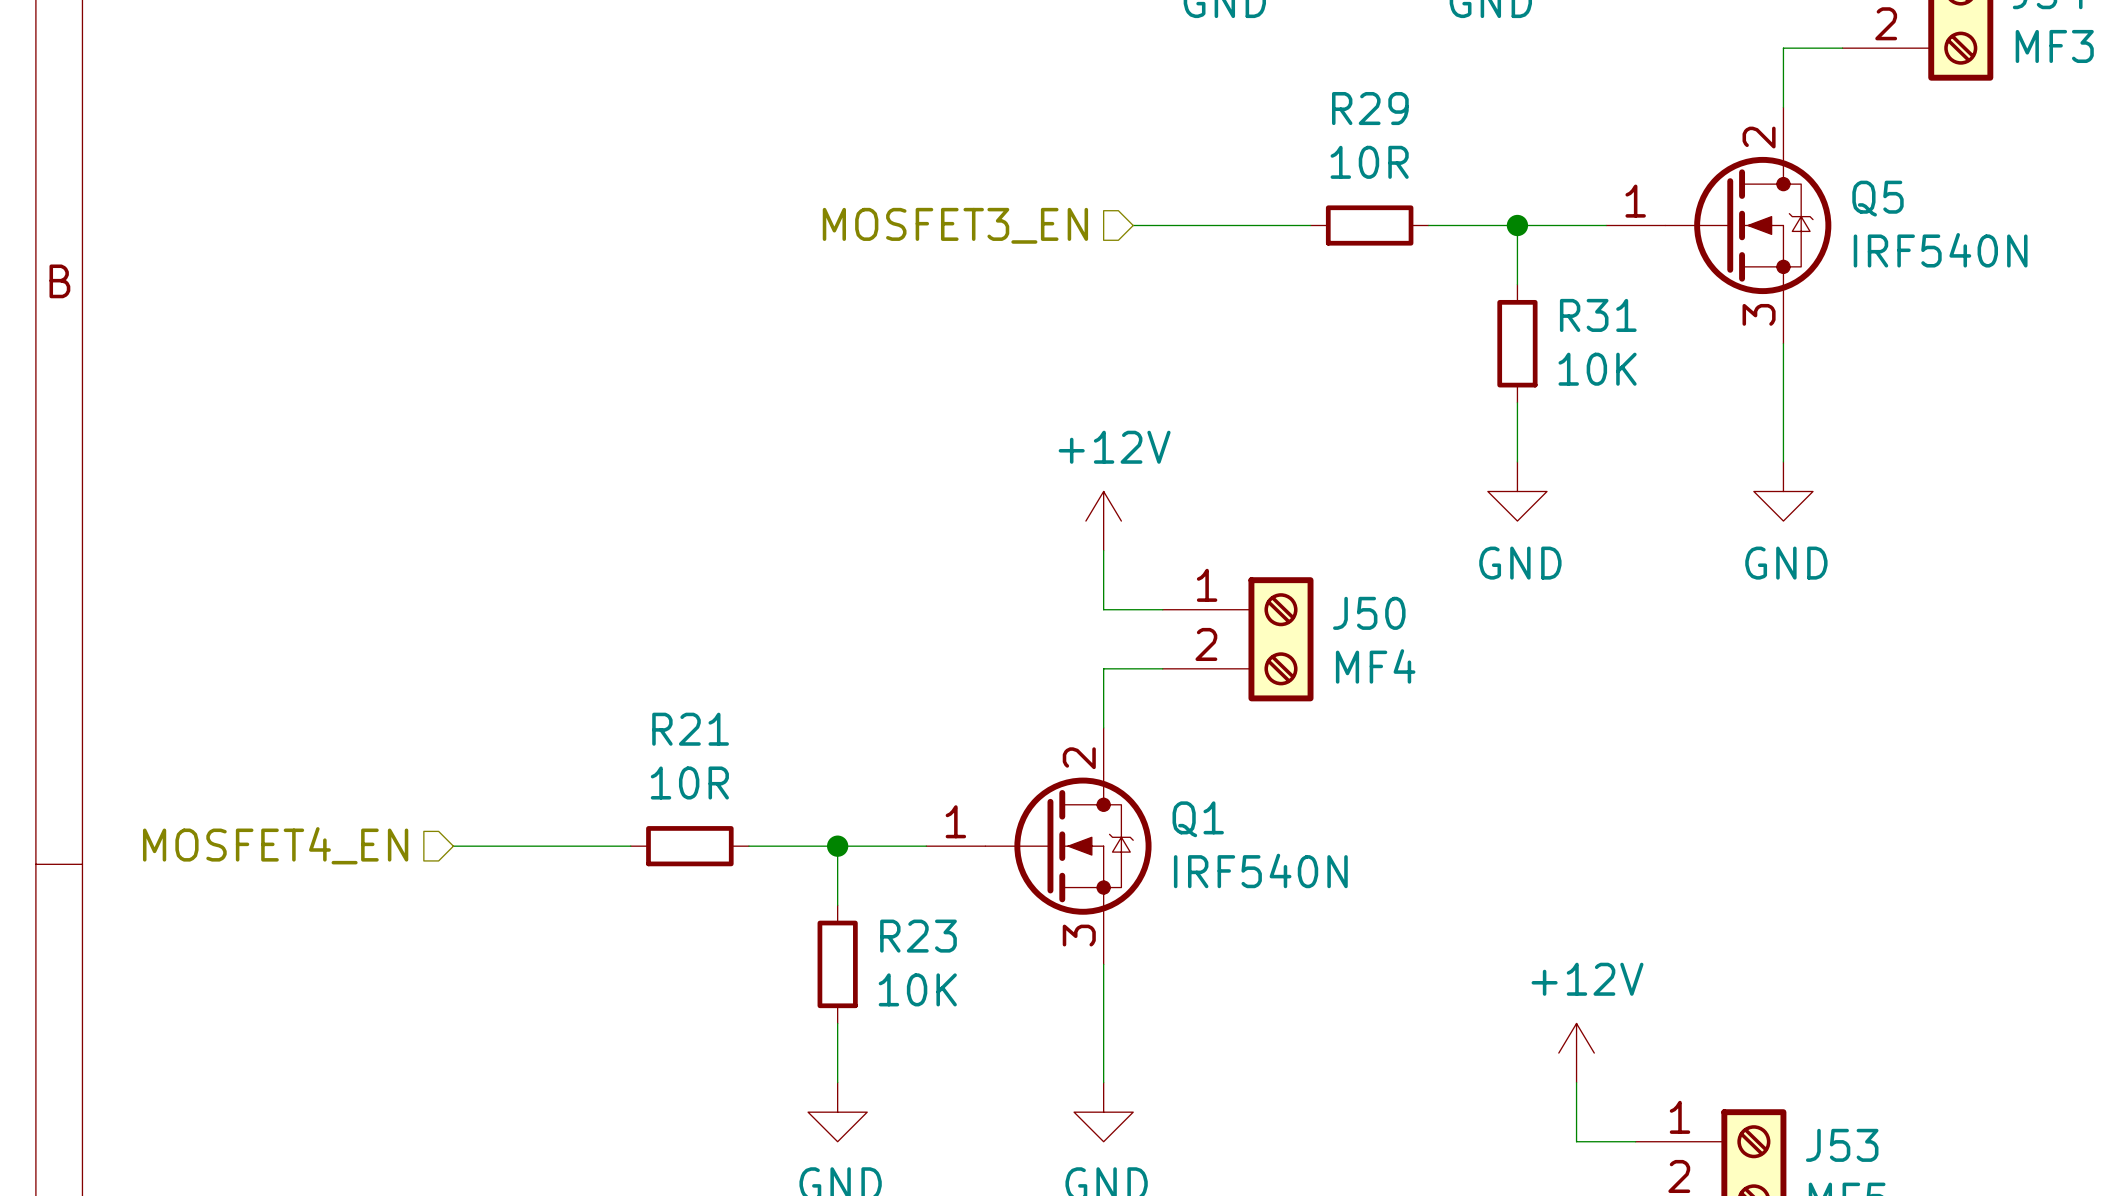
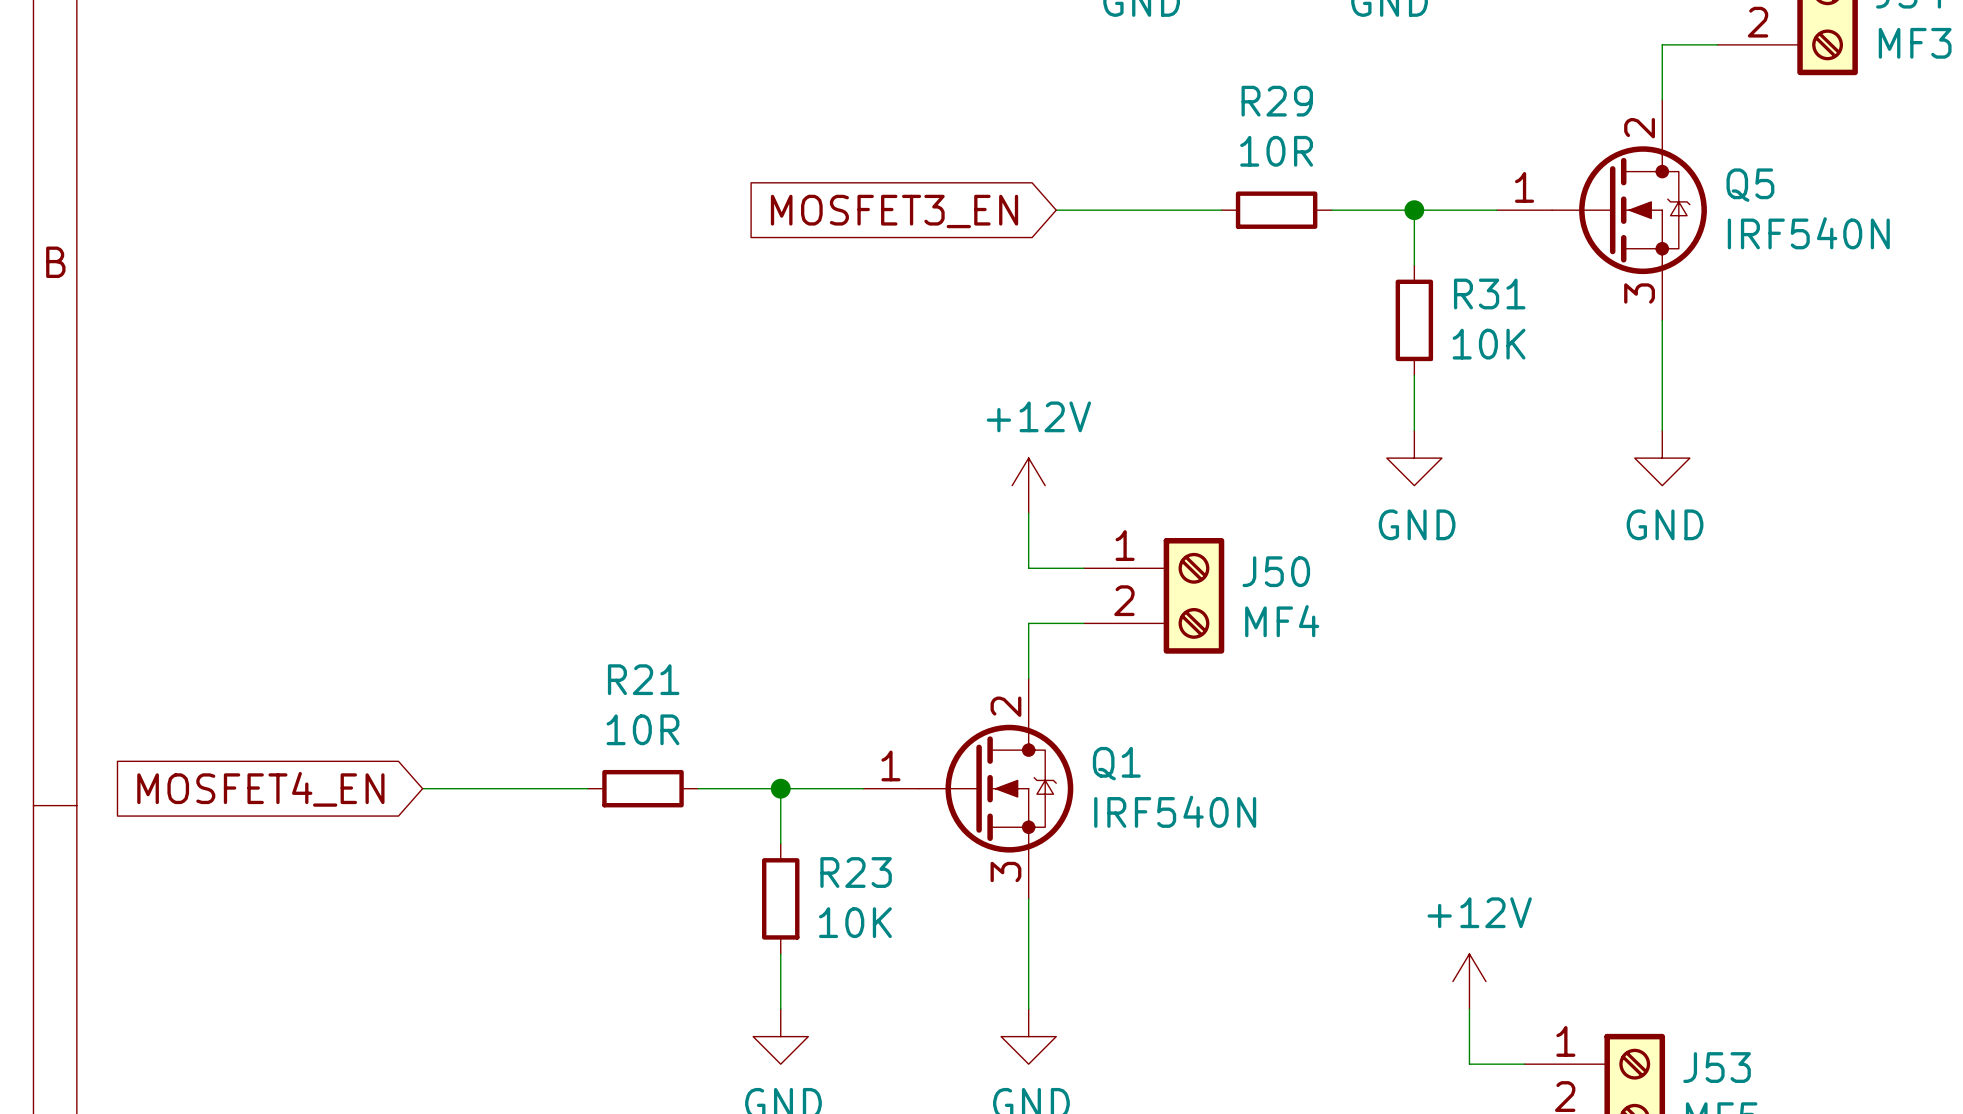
hierarchical label: MOSFET3_EN (955, 225) -> none
global label: none -> MOSFET3_EN (894, 211)
hierarchical label: MOSFET4_EN (275, 845) -> none
global label: none -> MOSFET4_EN (260, 789)

